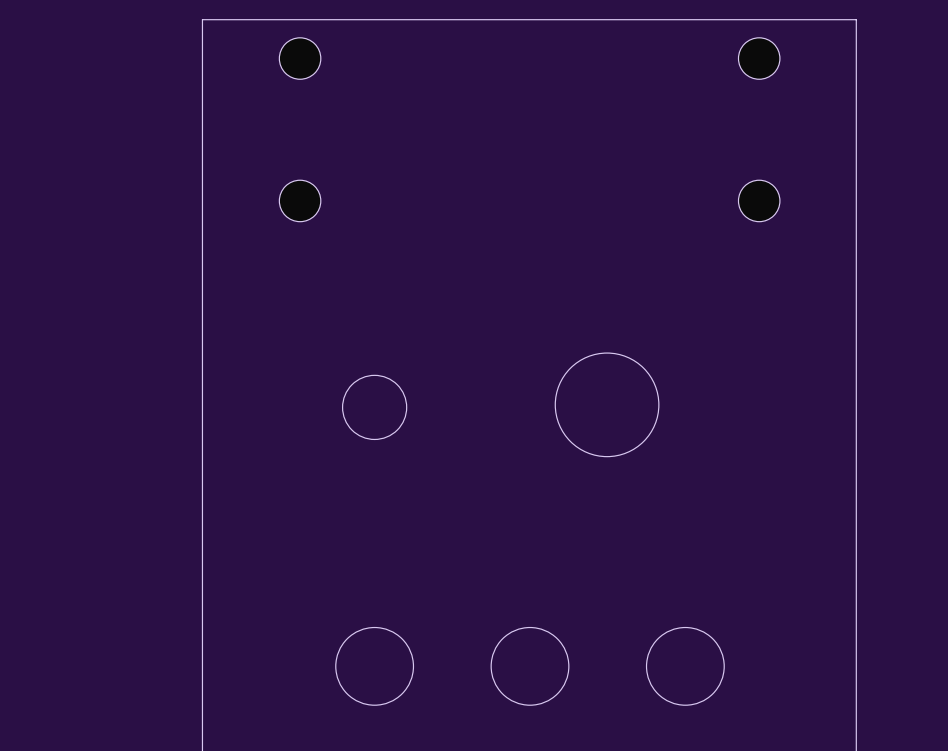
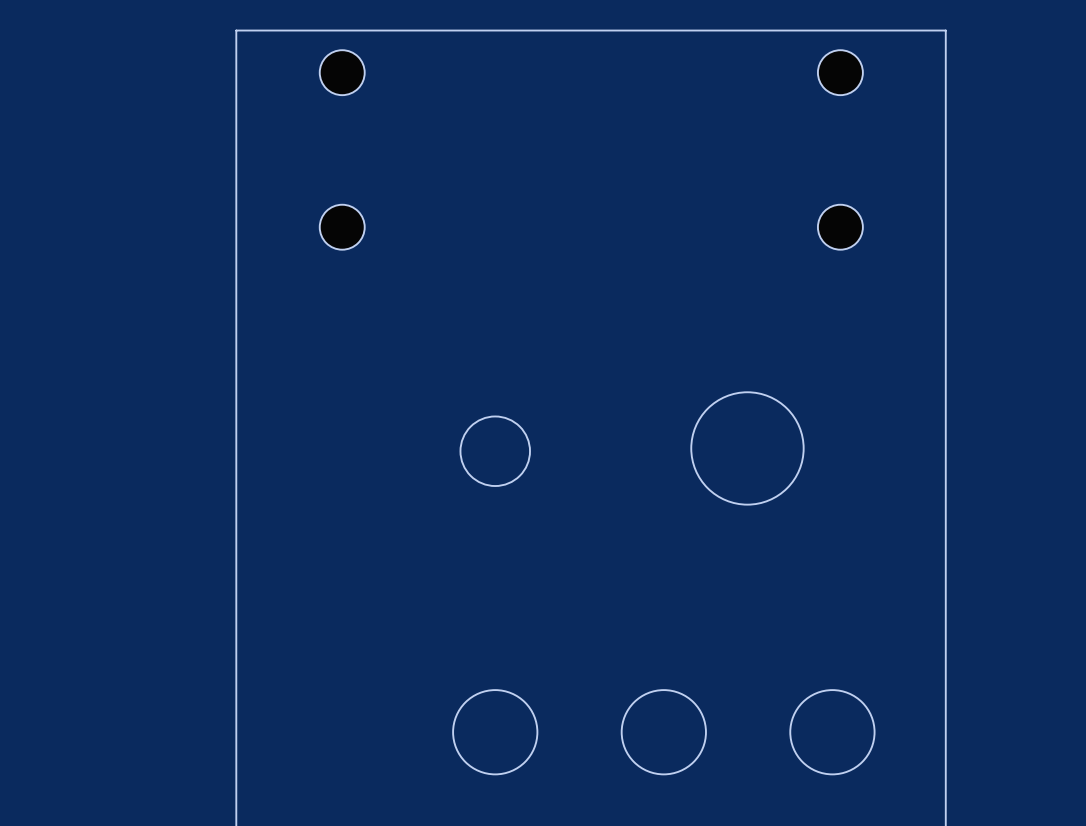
round board edge position: (607, 404) -> (747, 448)
round board edge position: (374, 407) -> (495, 451)
round board edge: [335, 627, 414, 706] -> none
round board edge: none -> [452, 689, 538, 775]
round board edge: [490, 627, 570, 706] -> none
round board edge: none -> [621, 689, 707, 775]
round board edge: [646, 627, 725, 706] -> none
round board edge: none -> [789, 689, 875, 775]

